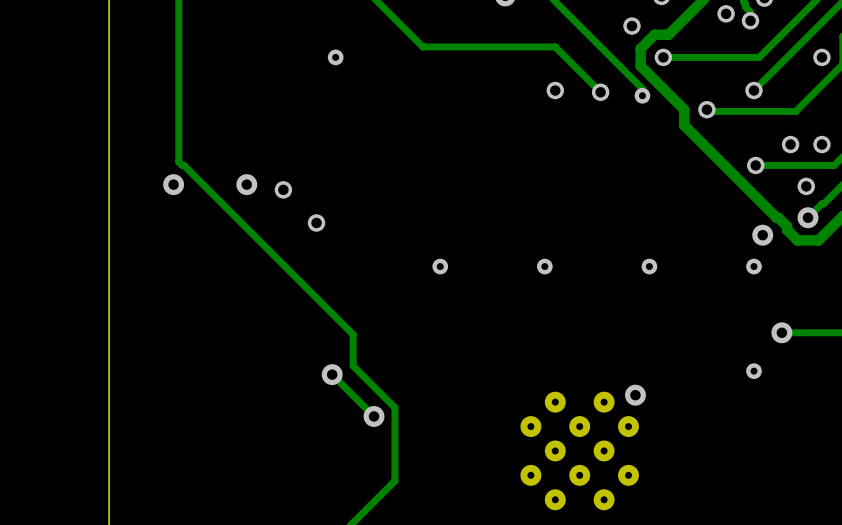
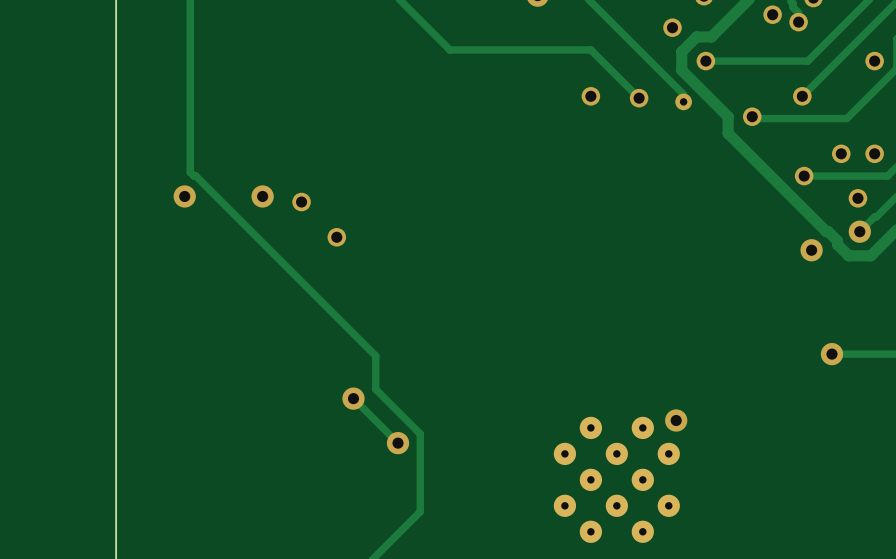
via: (335, 57) -> none
via: (440, 266) -> none
via: (544, 266) -> none
via: (649, 266) -> none
via: (753, 266) -> none
via: (753, 371) -> none

